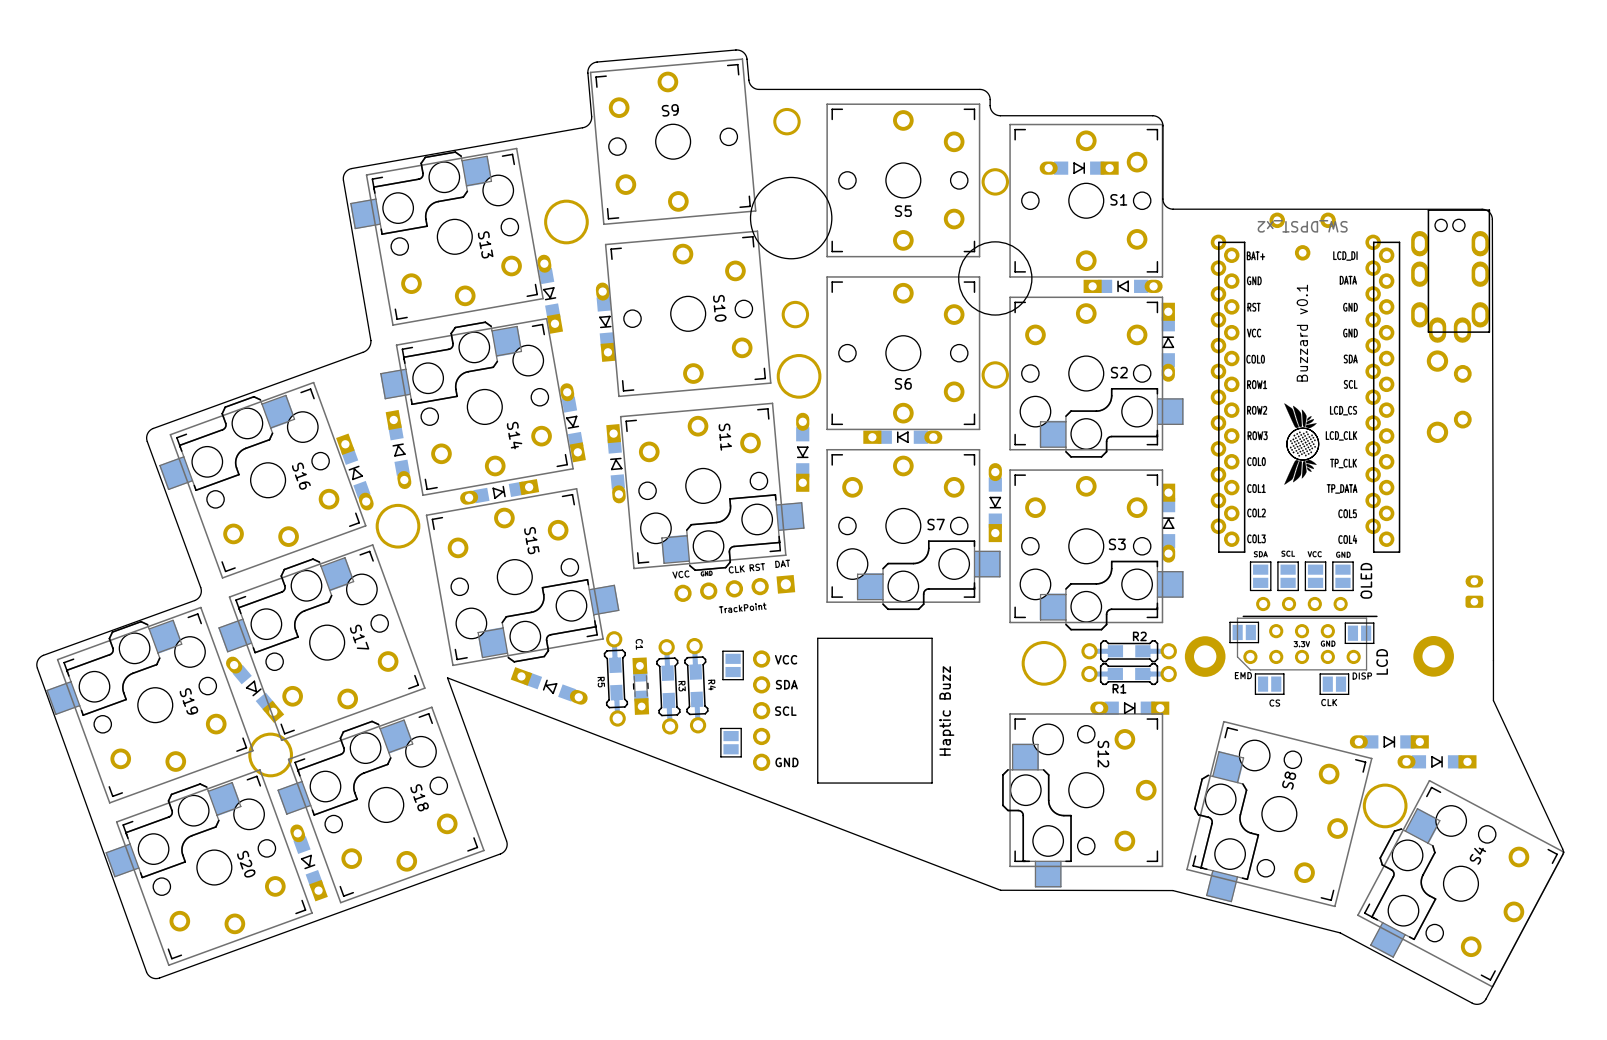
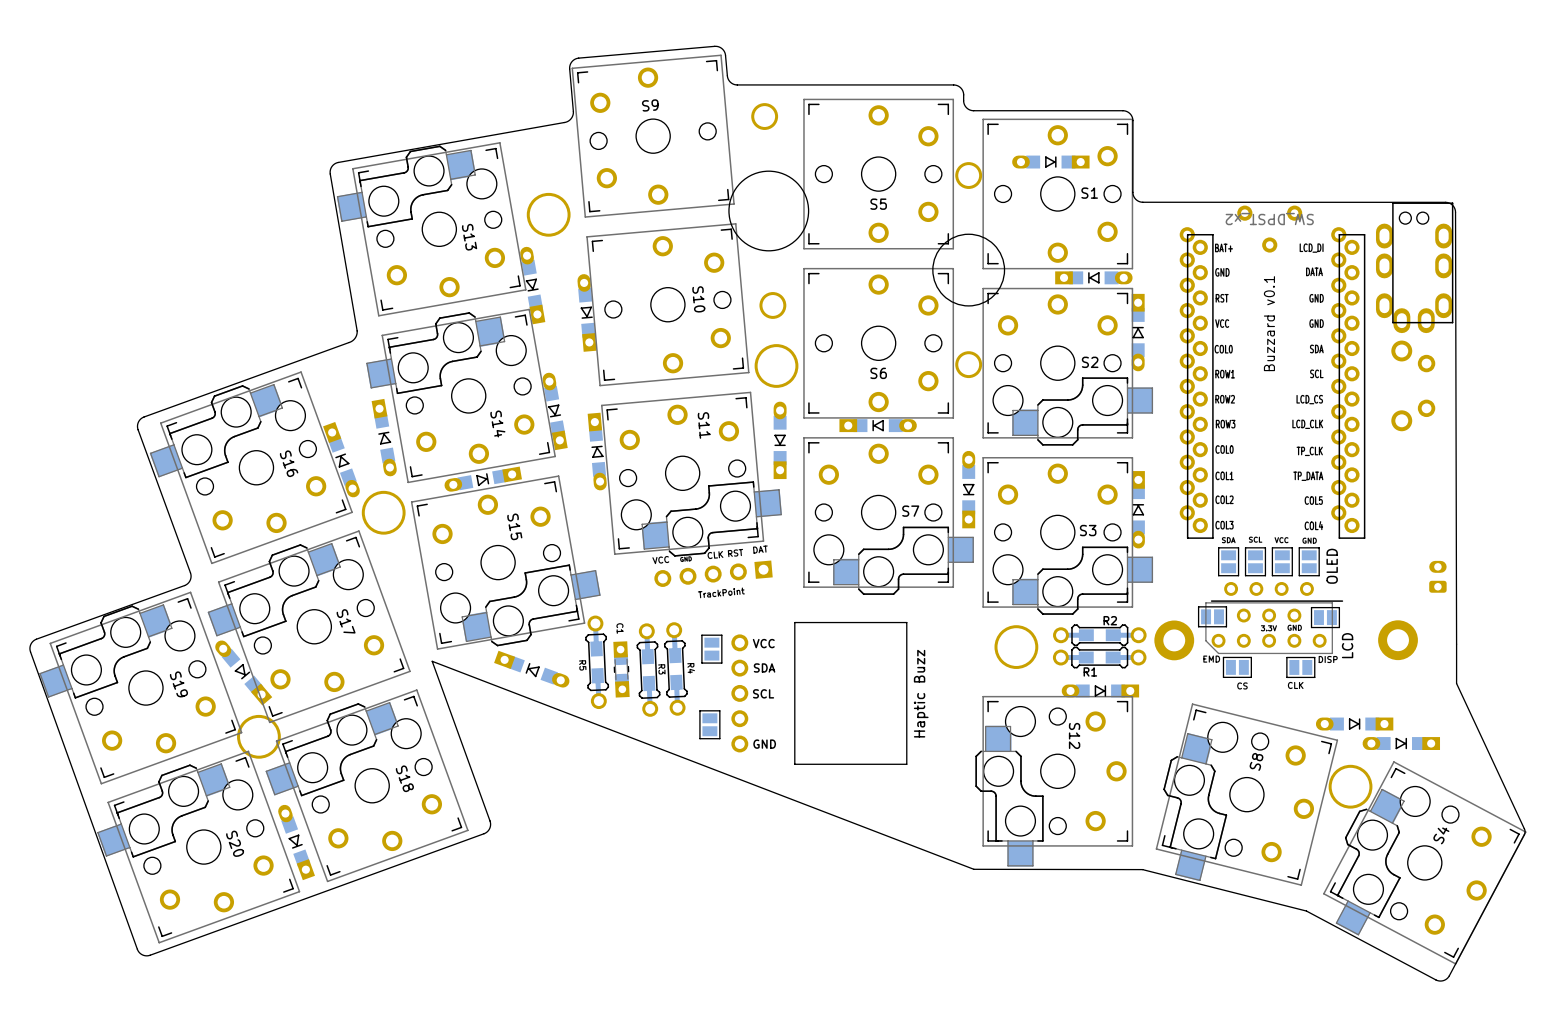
drawing: [1284, 403, 1317, 485] -> none
line: (1303, 428) (1292, 432) (1286, 443) (1291, 454) (1301, 459) (1313, 455) (1318, 444) (1314, 433) (1303, 428) -> none

